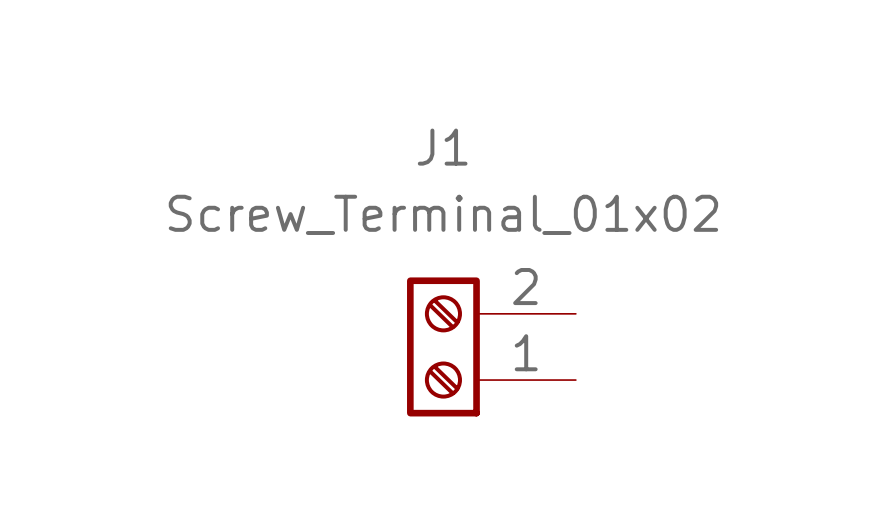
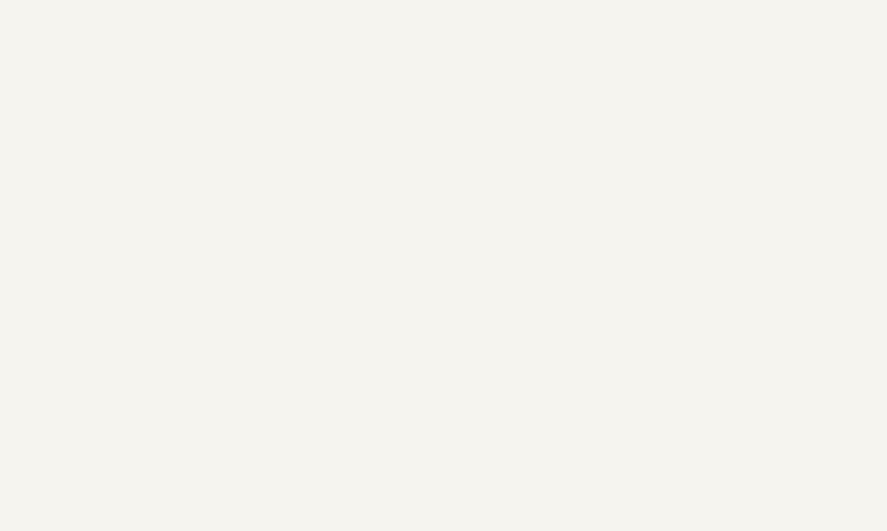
J1: Screw_Terminal_01x02 (491, 346) -> none

